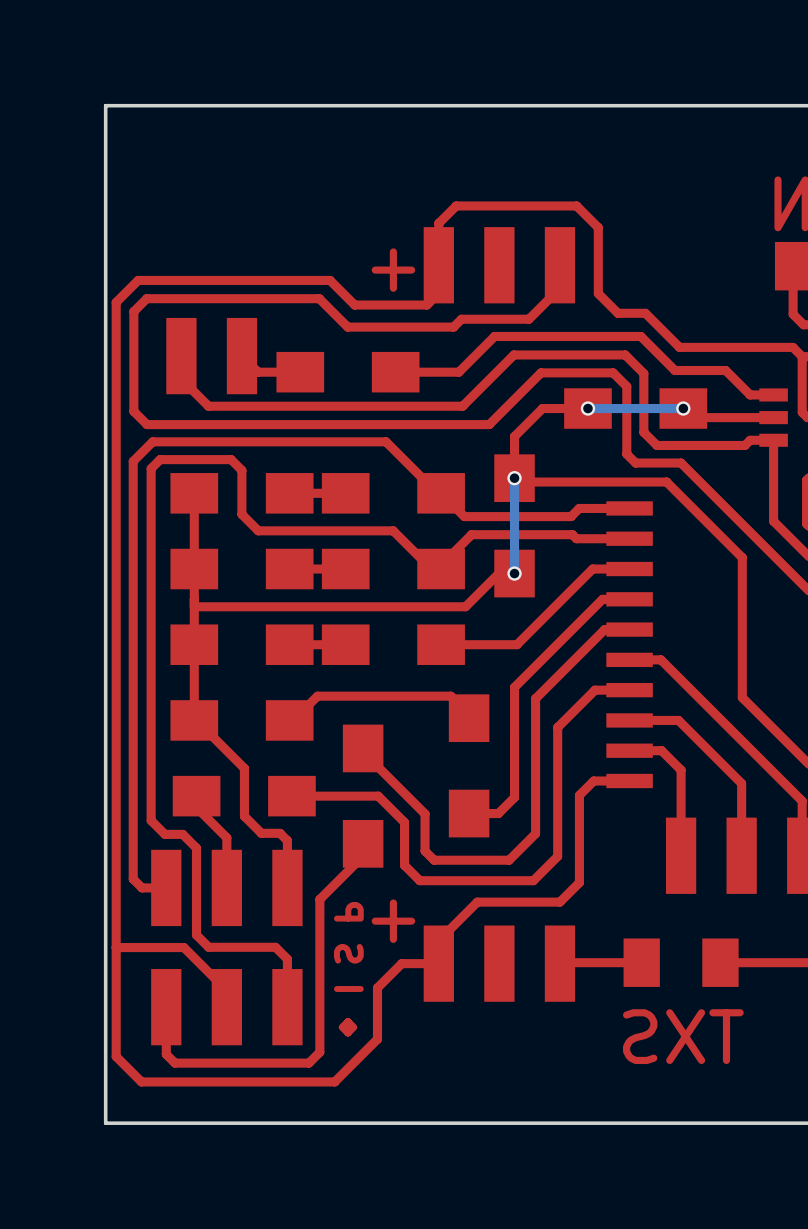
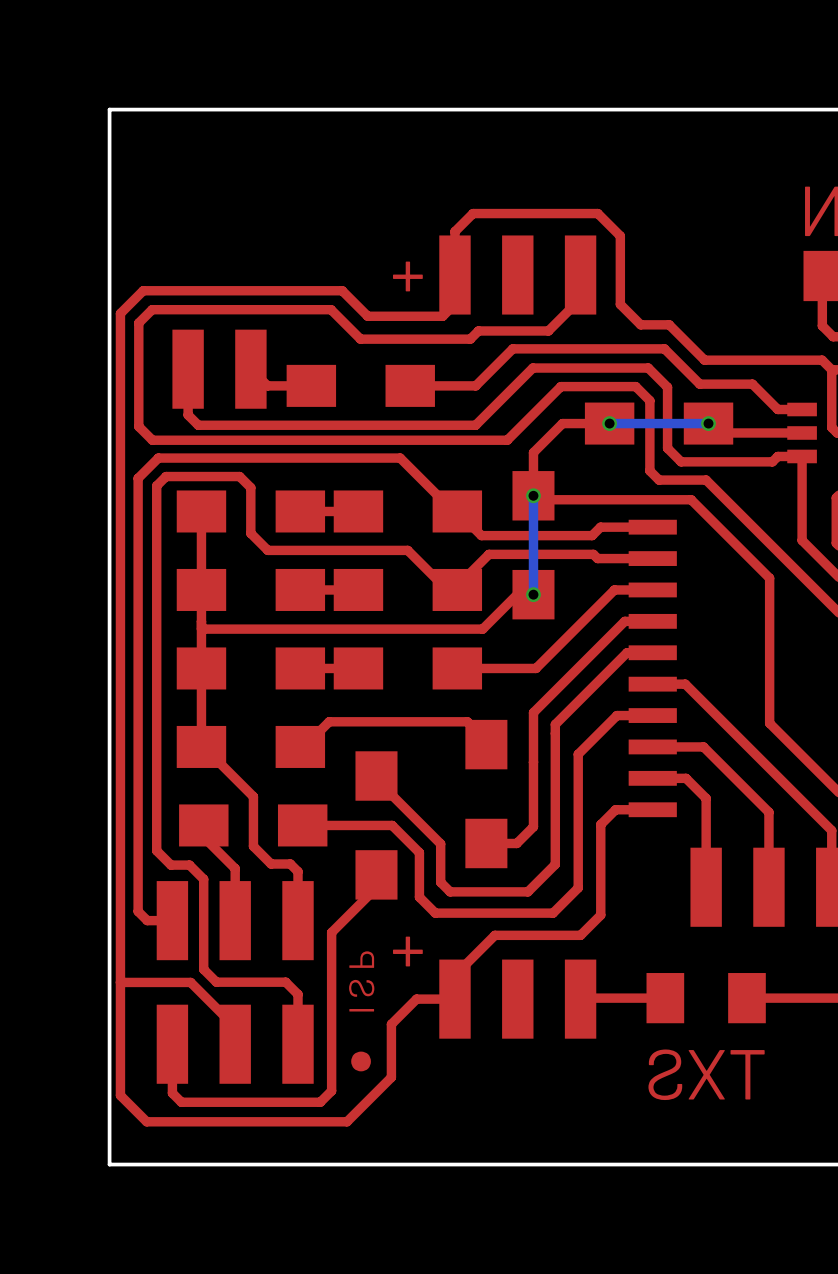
top track: (181, 379) (208, 406) (462, 406) -> (188, 393) (188, 415) (198, 425) (475, 425) (479, 421)

